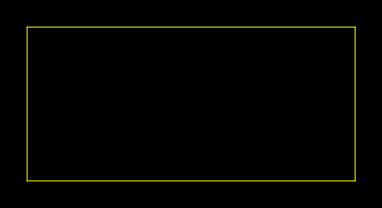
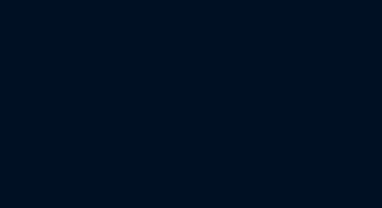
board edge: (355, 27) (27, 27) (27, 180) (355, 180) (355, 27) -> none

